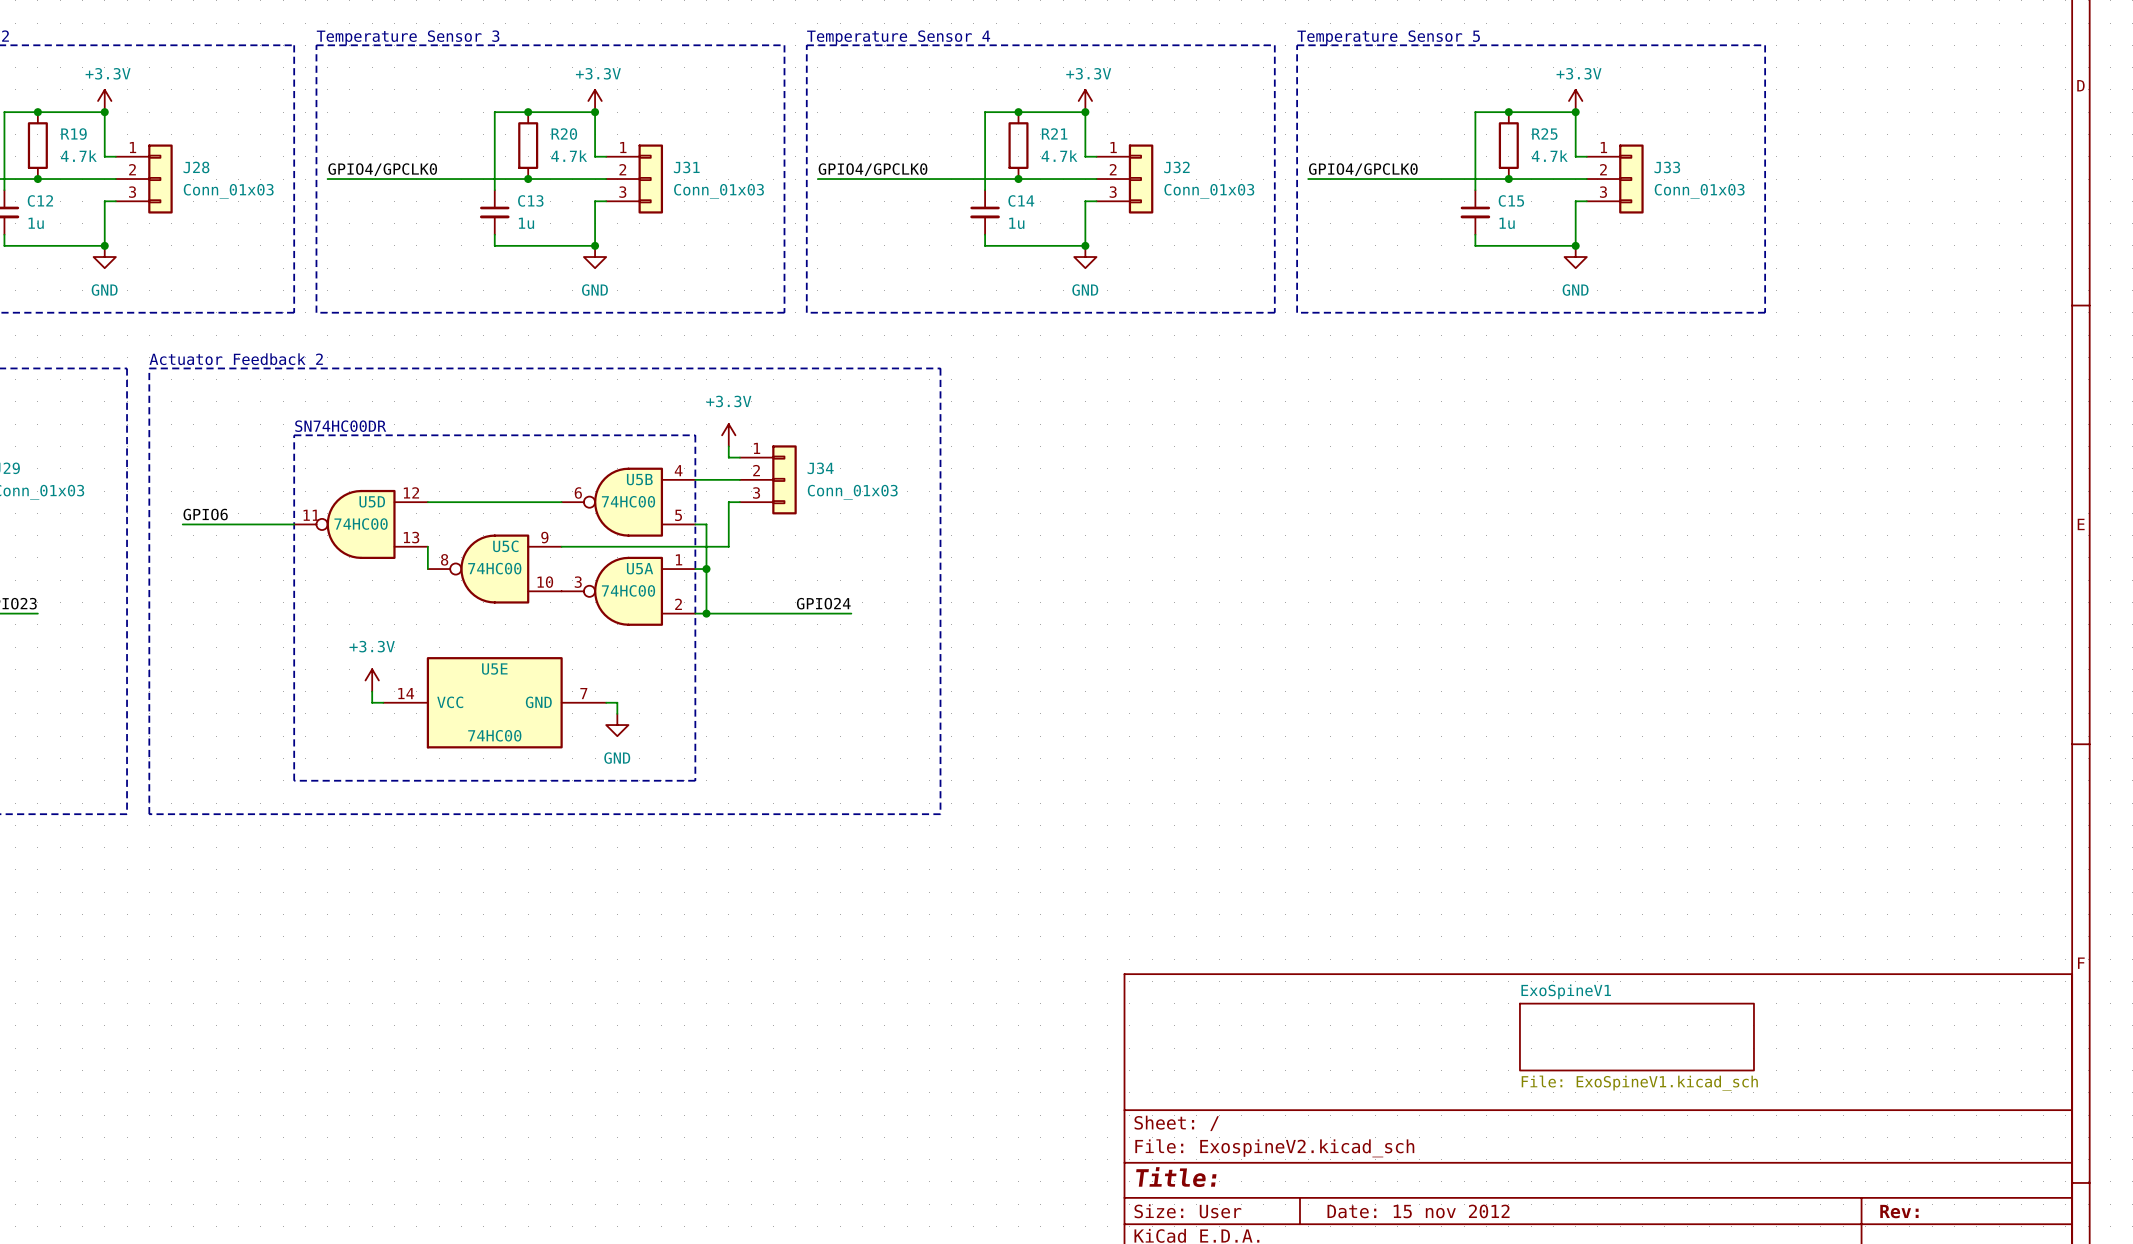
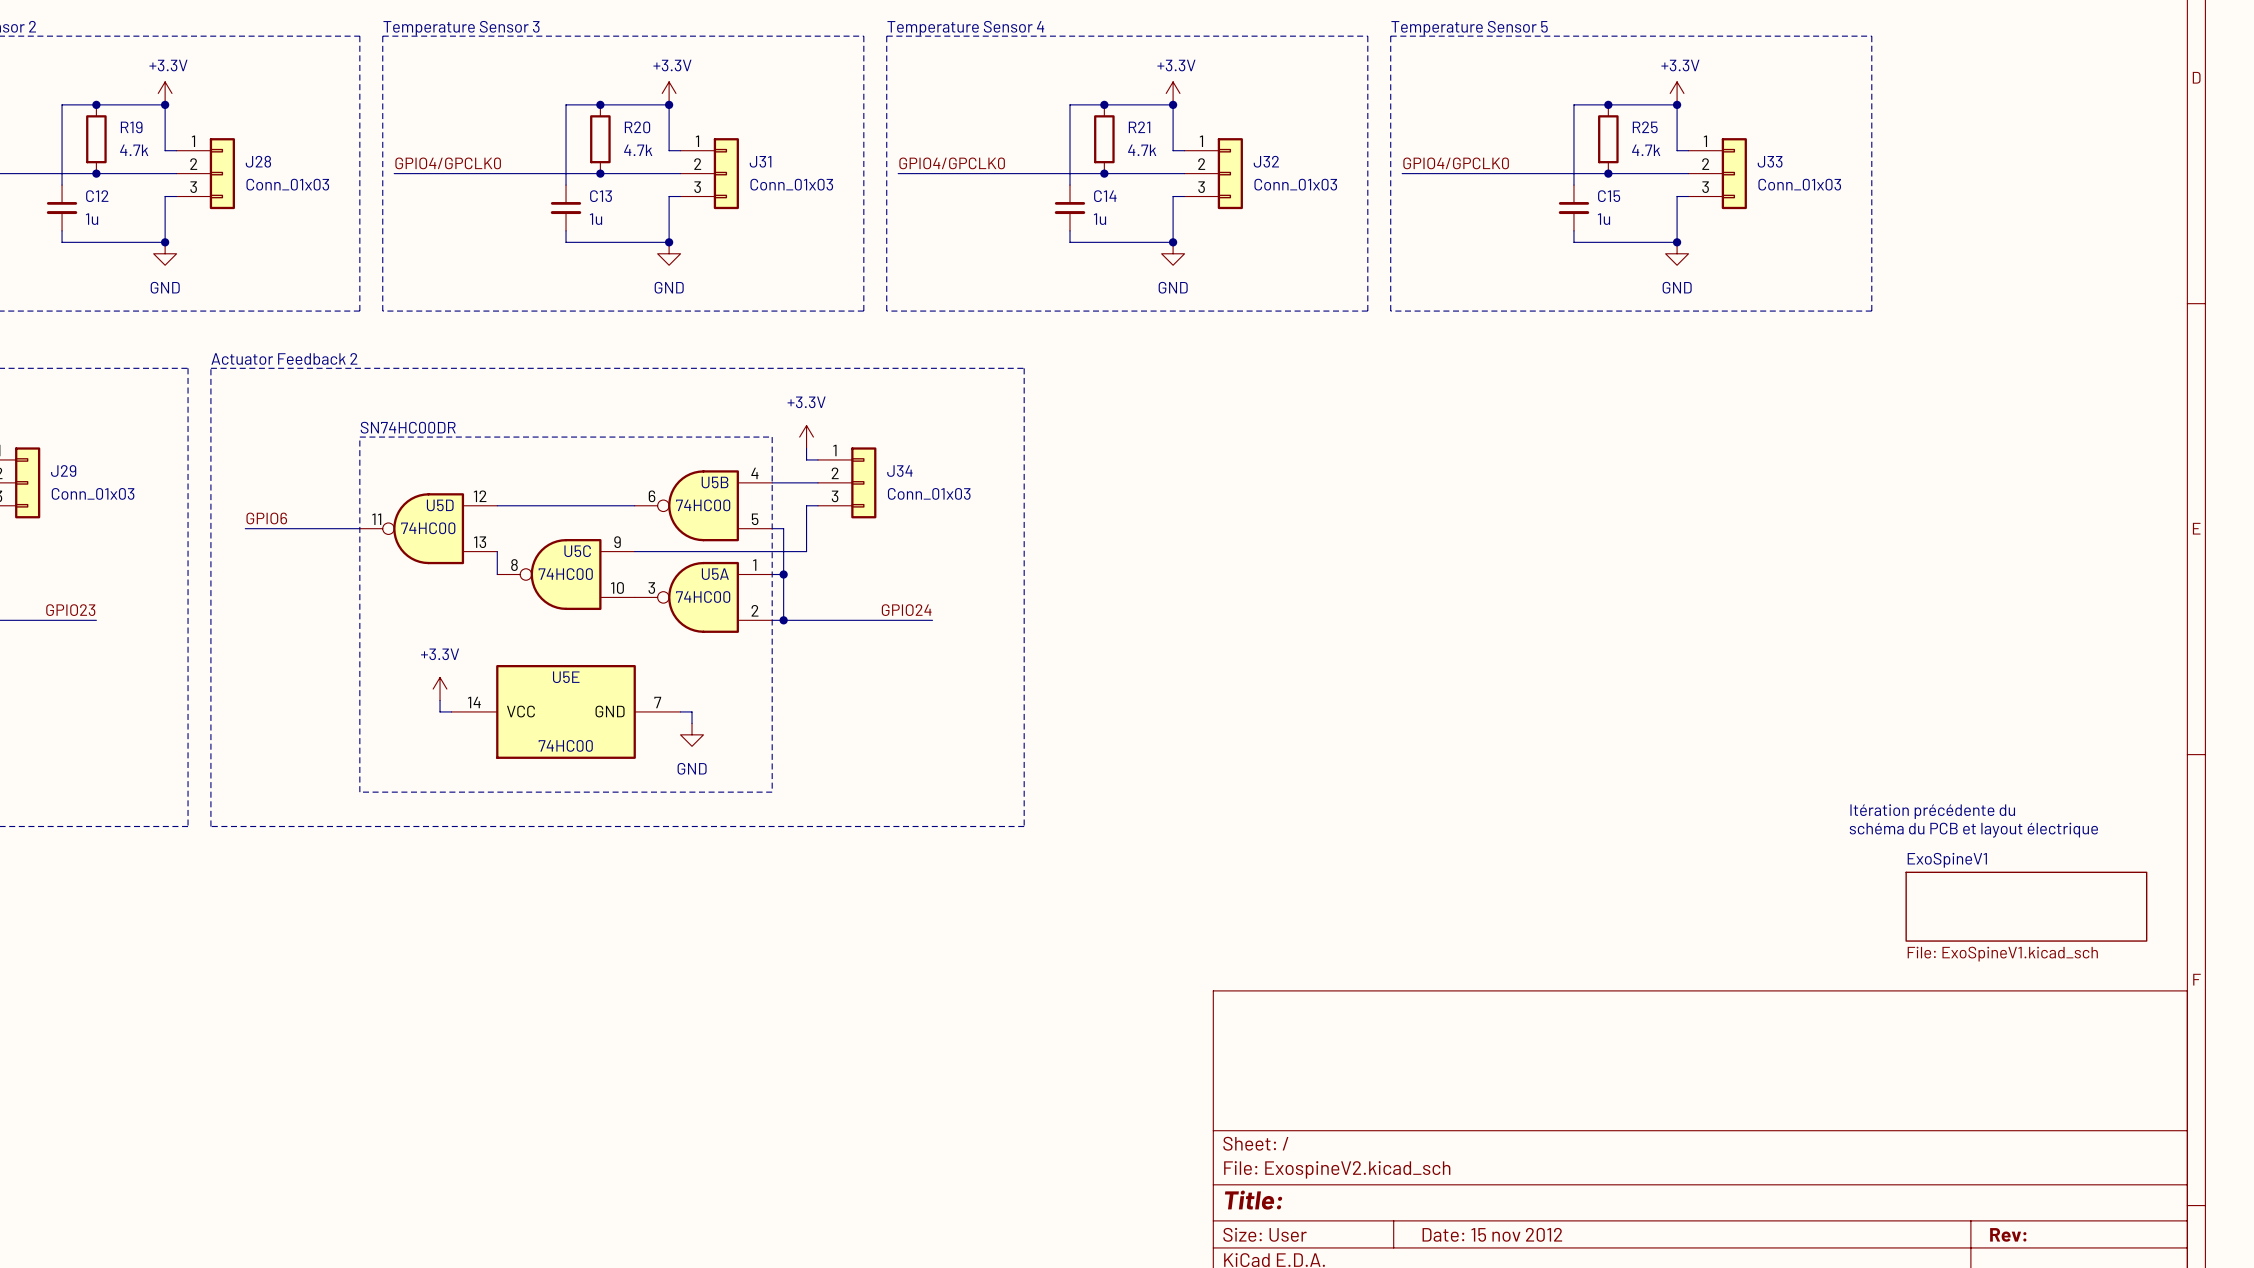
text: none -> Itération précédente du (1932, 811)
text: none -> schéma du PCB et layout électrique (1973, 830)
sheet ExoSpineV1 position: (1636, 1037) -> (2026, 906)

